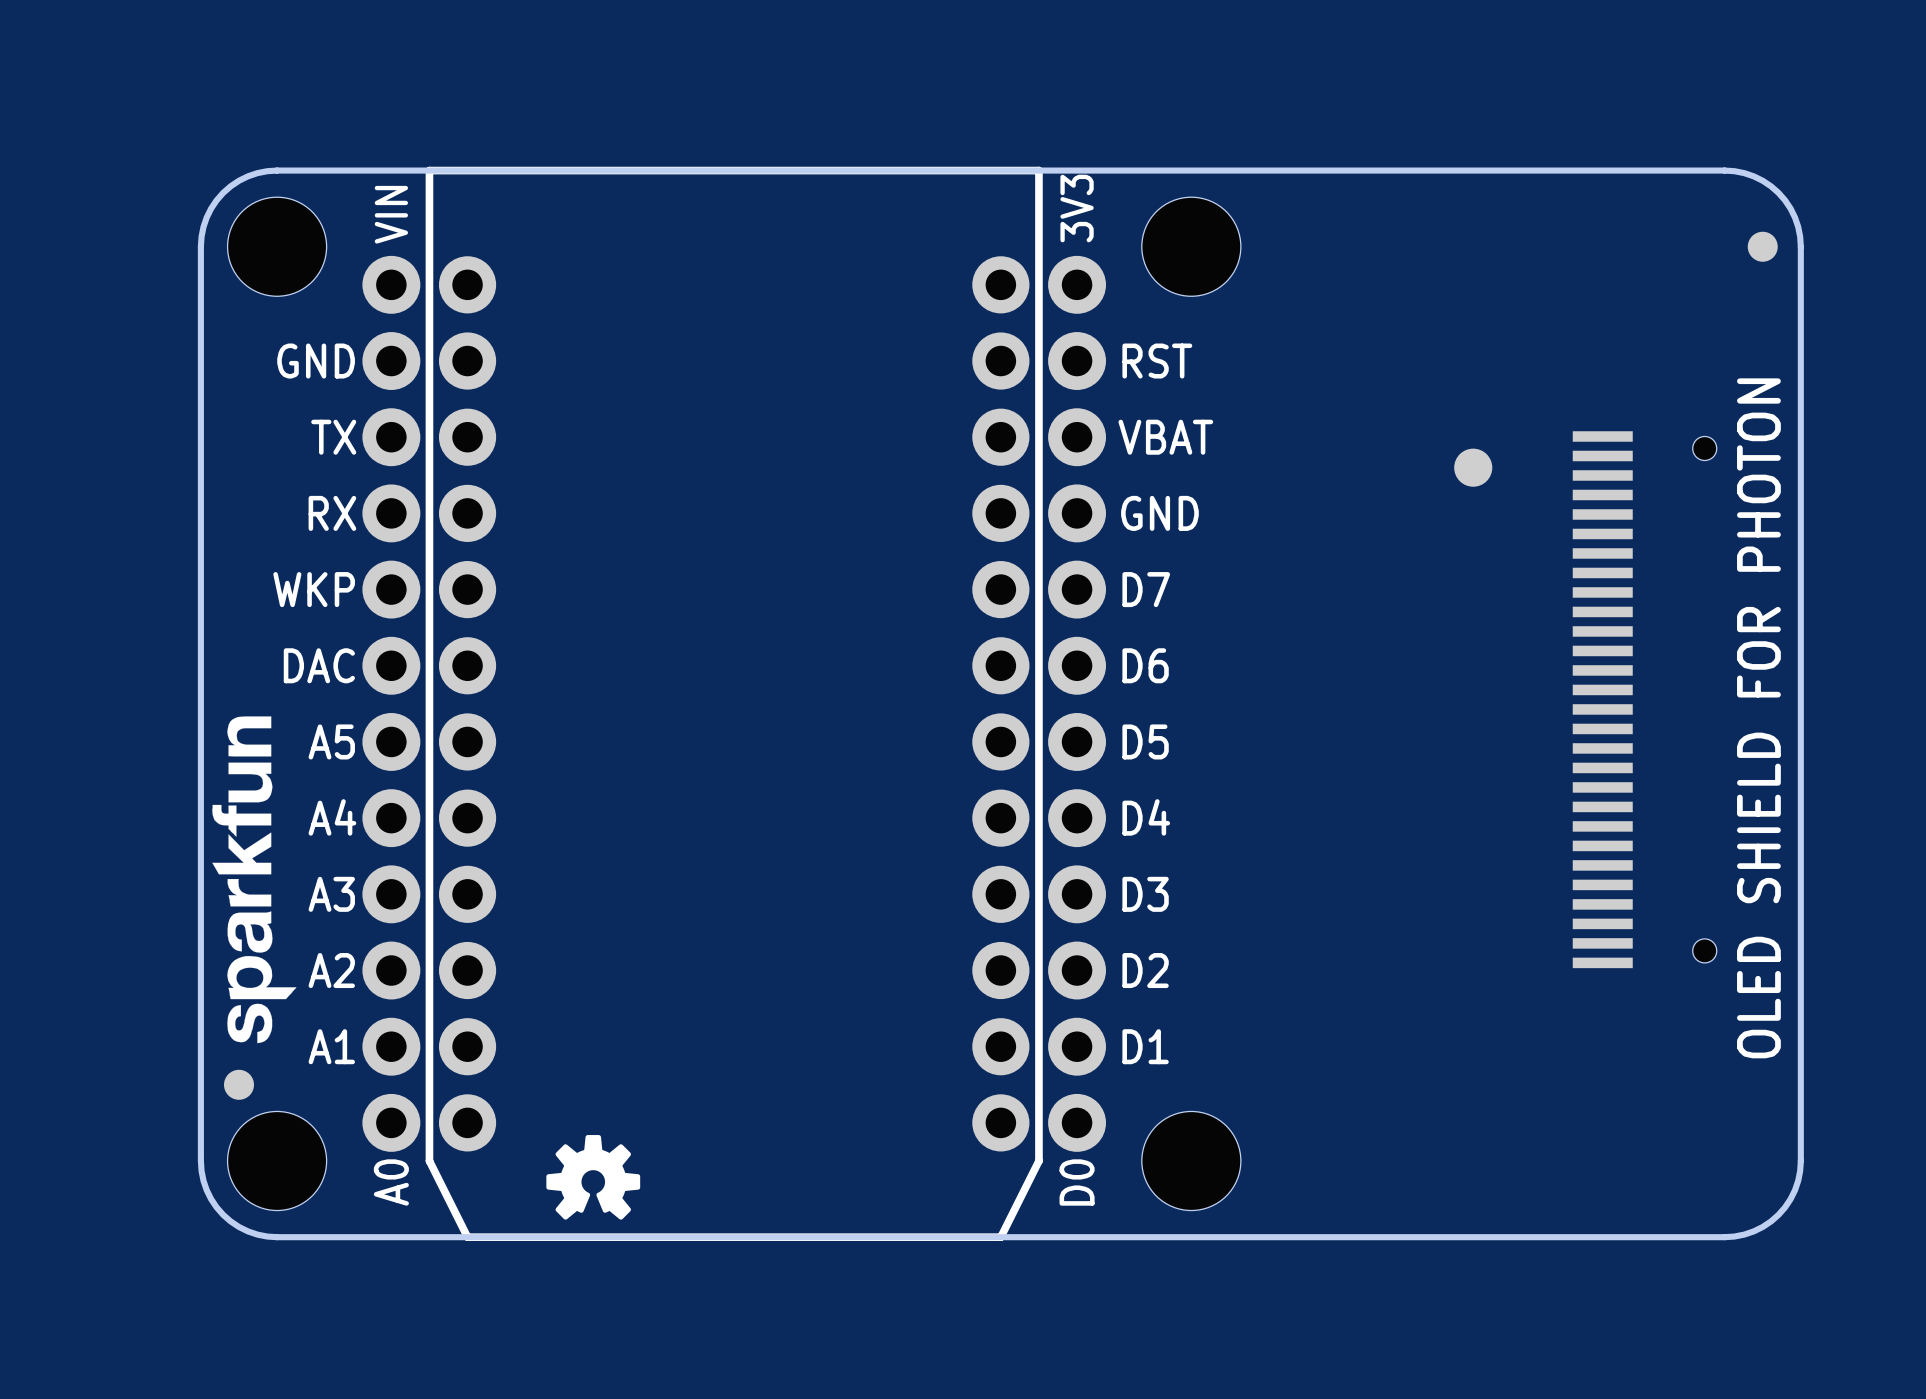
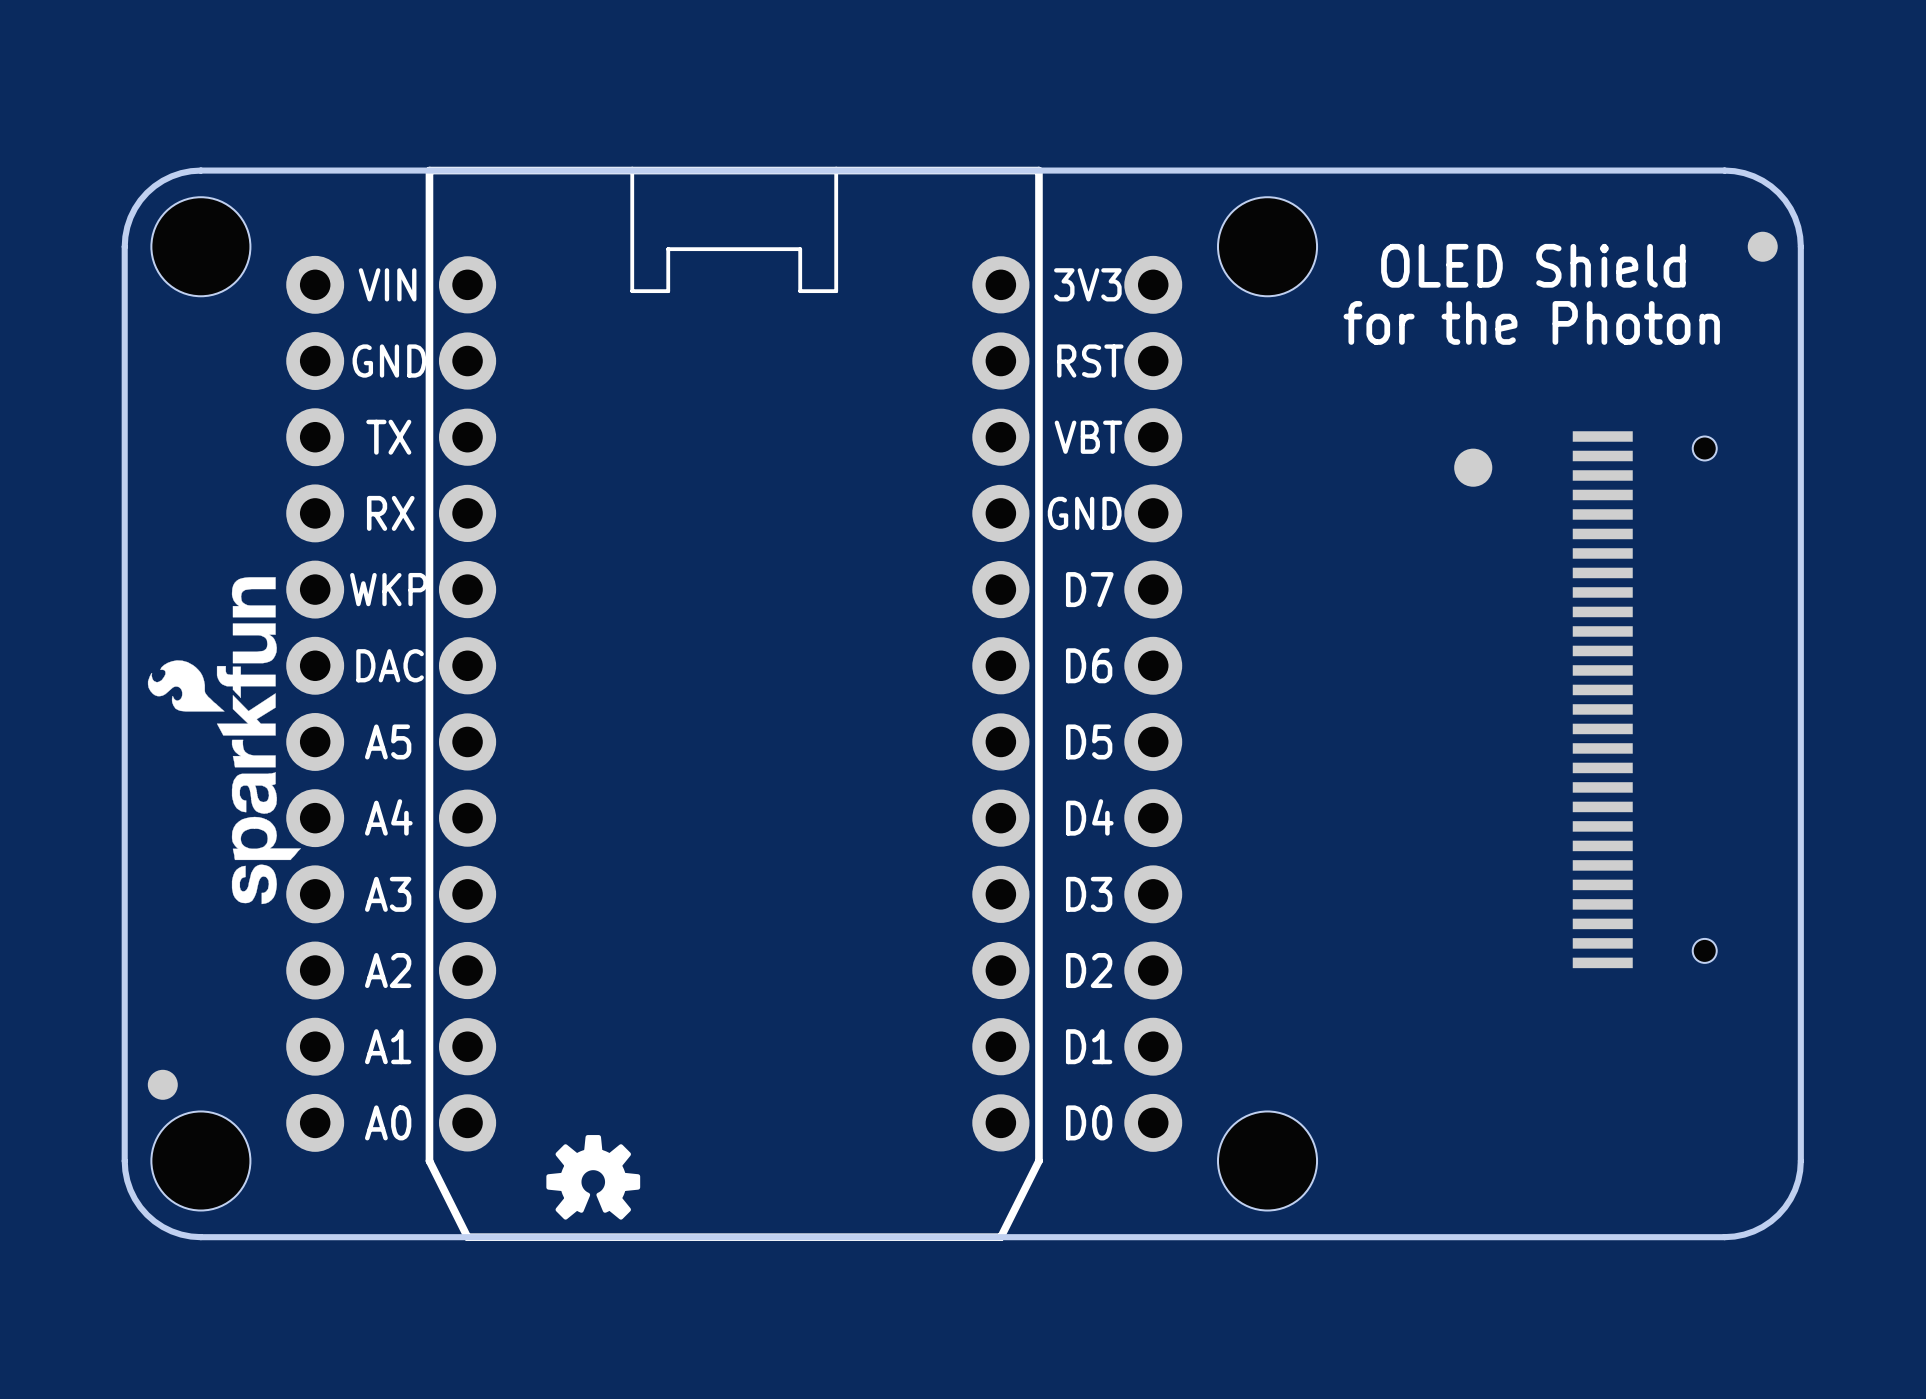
part footprint: [227, 166, 1241, 1241] -> [151, 166, 1318, 1241]
board edge: (277, 170) (247, 176) (223, 192) (206, 217) (200, 246) (201, 1170) (206, 1190) (223, 1214) (247, 1231) (277, 1237) -> (277, 170) (190, 171) (162, 180) (147, 192) (134, 208) (127, 227) (124, 246) (125, 1170) (130, 1190) (140, 1207) (154, 1221) (171, 1231) (200, 1237) (277, 1237)
text: none -> OLED Shield (1533, 265)
text: none -> for the Photon (1531, 322)
drawing: none -> [147, 577, 301, 905]
drawing: [212, 716, 297, 1044] -> none
text: OLED SHIELD FOR PHOTON (1758, 718) -> none
part position: (238, 1084) -> (162, 1084)

